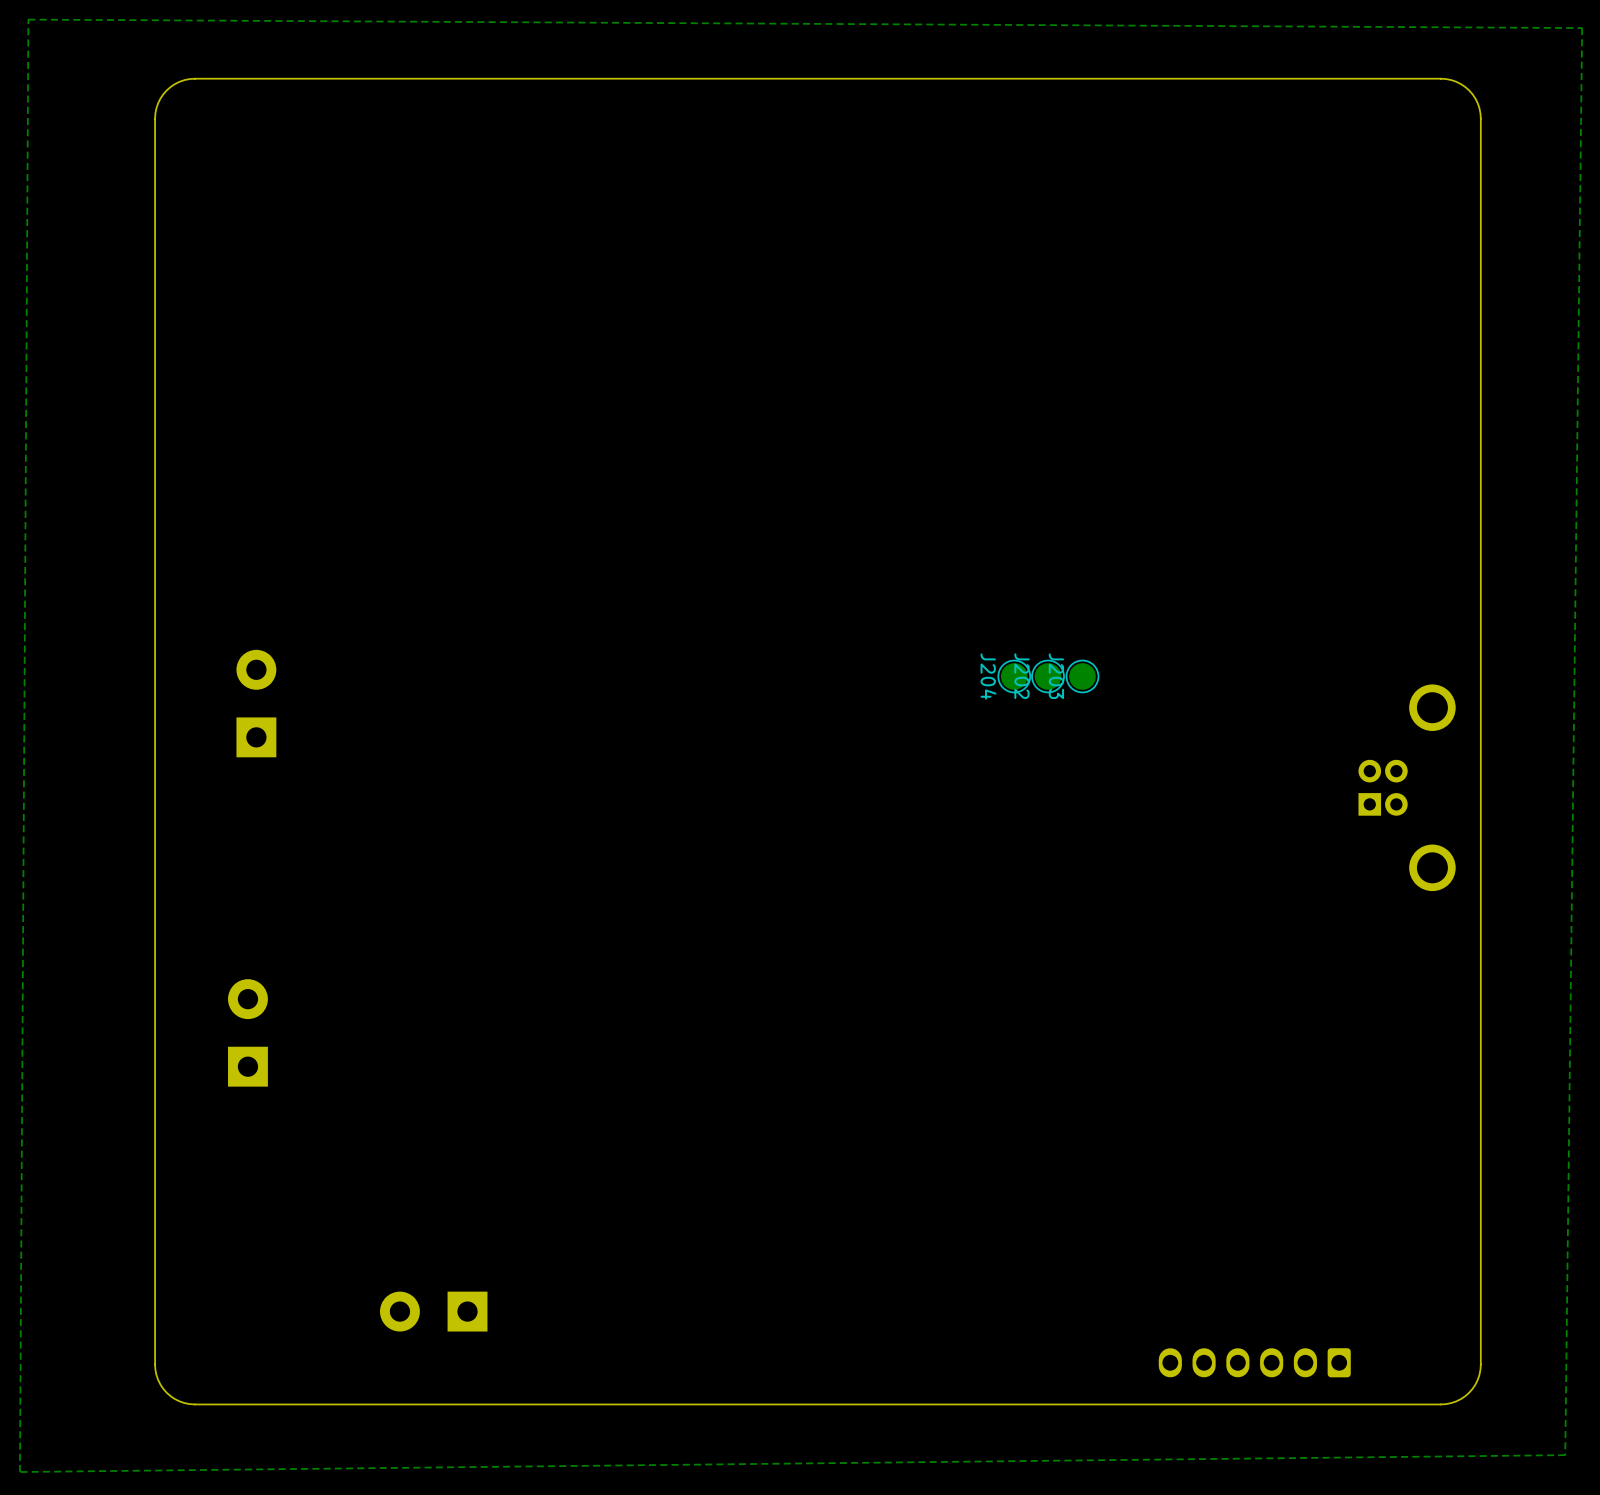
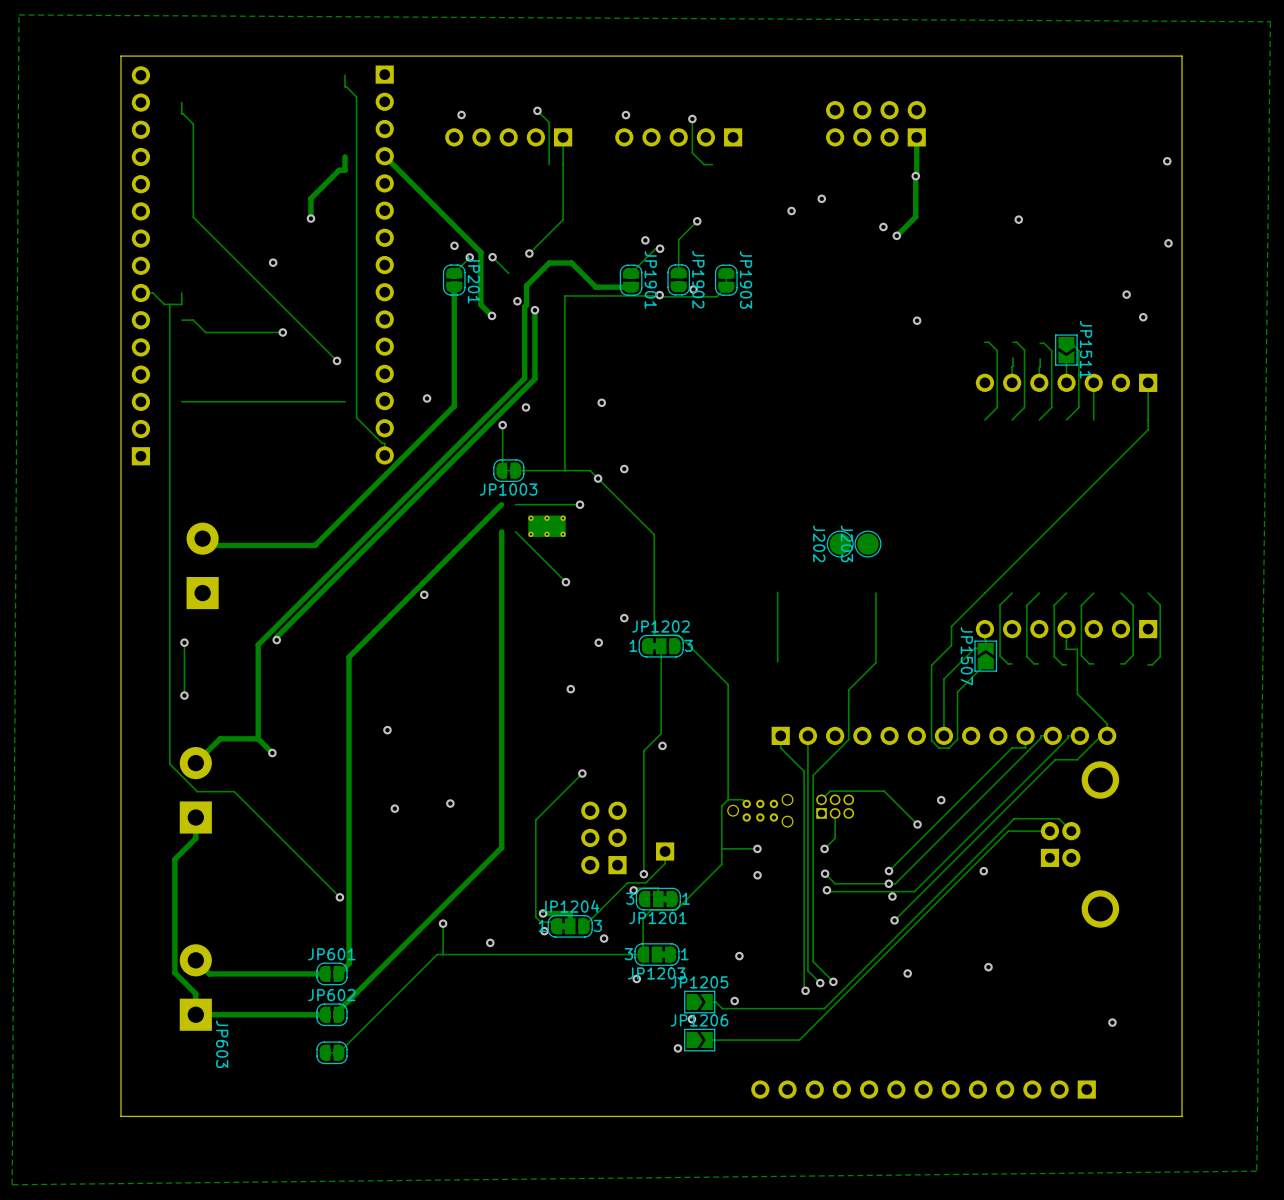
track: none -> (345, 75) (345, 86) (356, 96) (356, 417) (382, 443) (384, 443) (384, 455)
board edge: (155, 118) (158, 103) (166, 90) (179, 81) (194, 78) (1440, 78) (1456, 81) (1469, 90) (1477, 103) (1480, 118) (1480, 1364) (1477, 1379) (1469, 1392) (1456, 1401) (1440, 1404) (194, 1404) (179, 1401) (166, 1392) (158, 1379) (155, 1364) -> (121, 94) (121, 56) (1182, 56) (1182, 1116) (121, 1116) (121, 1098)
track: none -> (181, 102) (181, 114) (193, 124) (193, 217) (337, 360)
track: none -> (537, 110) (549, 122) (549, 164)
via: none -> (537, 110)
via: none -> (461, 114)
via: none -> (625, 115)
track: none -> (692, 118) (692, 152) (704, 164) (712, 164)
via: none -> (692, 118)
part: none -> (875, 123)
part: none -> (508, 137)
track: none -> (563, 137) (563, 219) (529, 253)
part: none -> (678, 137)
track: none -> (916, 137) (915, 216) (896, 235)
track: none -> (384, 156) (480, 252) (480, 304) (491, 315)
track: none -> (345, 156) (345, 170) (339, 170) (310, 198) (310, 218)
via: none -> (1167, 161)
via: none -> (915, 176)
via: none -> (821, 198)
via: none -> (791, 210)
via: none -> (310, 218)
via: none -> (1018, 219)
track: none -> (697, 221) (678, 239) (678, 272)
via: none -> (697, 221)
via: none -> (883, 227)
via: none -> (896, 235)
via: none -> (645, 240)
via: none -> (1168, 243)
via: none -> (454, 245)
track: none -> (660, 248) (655, 248) (631, 273)
via: none -> (660, 248)
via: none -> (529, 253)
track: none -> (469, 257) (454, 273)
via: none -> (469, 257)
track: none -> (492, 257) (508, 273)
via: none -> (492, 257)
via: none -> (273, 262)
part: none -> (384, 265)
part: none -> (140, 265)
track: none -> (726, 273) (726, 287) (716, 296) (659, 295)
JP201: none -> (454, 280)
JP1901: none -> (631, 280)
JP1902: none -> (678, 279)
JP1903: none -> (726, 280)
track: none -> (454, 287) (454, 406) (315, 545) (195, 545)
track: none -> (631, 287) (595, 287) (571, 262) (549, 262) (526, 285) (524, 378) (258, 644) (258, 738)
via: none -> (693, 289)
track: none -> (181, 292) (181, 304) (164, 304) (152, 293) (140, 293)
via: none -> (1126, 294)
via: none -> (659, 295)
track: none -> (659, 295) (564, 295) (564, 470)
via: none -> (517, 301)
track: none -> (169, 304) (169, 764) (197, 791) (234, 791) (339, 897)
track: none -> (534, 310) (534, 378) (276, 637) (276, 640)
via: none -> (534, 310)
via: none -> (491, 315)
via: none -> (1143, 317)
track: none -> (181, 320) (193, 320) (205, 332) (282, 332)
via: none -> (917, 320)
via: none -> (282, 332)
track: none -> (984, 342) (988, 342) (997, 350) (997, 407) (984, 419)
track: none -> (1012, 342) (1016, 342) (1024, 350) (1024, 407) (1012, 419)
track: none -> (1066, 342) (1070, 342) (1078, 350) (1078, 407) (1066, 419)
track: none -> (1040, 343) (1044, 343) (1051, 350) (1051, 407) (1039, 419)
JP1511: none -> (1066, 350)
track: none -> (1012, 357) (1012, 382)
track: none -> (1066, 357) (1066, 382)
track: none -> (1040, 358) (1039, 382)
via: none -> (337, 360)
part: none -> (1066, 382)
track: none -> (1093, 382) (1093, 419)
track: none -> (1148, 382) (1148, 429) (951, 626) (951, 645) (931, 665) (931, 740) (939, 748) (948, 748) (957, 739) (957, 692) (985, 663)
via: none -> (427, 398)
track: none -> (345, 401) (181, 401)
via: none -> (601, 402)
via: none -> (525, 407)
track: none -> (502, 425) (502, 470)
via: none -> (502, 425)
via: none -> (624, 469)
track: none -> (501, 470) (590, 470) (654, 534) (654, 635) (678, 635) (728, 684) (728, 799)
JP1003: none -> (508, 470)
via: none -> (598, 478)
track: none -> (501, 504) (349, 657) (349, 963) (338, 973)
track: none -> (579, 504) (515, 504)
via: none -> (580, 504)
part: none -> (547, 526)
track: none -> (501, 531) (501, 847) (338, 1010) (338, 1014)
track: none -> (515, 531) (565, 582)
J204: (1014, 676) -> none
via: none -> (565, 582)
track: none -> (777, 592) (777, 661)
track: none -> (875, 593) (875, 662) (848, 689) (848, 739) (813, 775) (813, 961) (833, 981)
track: none -> (1012, 593) (1000, 605) (1000, 655) (1008, 663) (1011, 663)
track: none -> (1039, 593) (1026, 605) (1026, 656) (1034, 663) (1038, 663)
track: none -> (1066, 593) (1054, 605) (1054, 656) (1062, 664) (1066, 664)
track: none -> (1093, 593) (1081, 605) (1081, 655) (1089, 663) (1093, 663)
track: none -> (1120, 593) (1133, 605) (1133, 655) (1124, 663) (1120, 663)
track: none -> (1148, 593) (1160, 605) (1160, 656) (1152, 664) (1147, 664)
via: none -> (424, 594)
via: none -> (624, 618)
track: none -> (984, 629) (985, 648) (974, 648) (943, 679) (943, 735)
track: none -> (1066, 629) (1066, 649) (1077, 649) (1077, 694) (1107, 723) (1107, 735)
part: none -> (1066, 629)
part position: (1407, 787) -> (1079, 844)
via: none -> (276, 640)
track: none -> (184, 642) (184, 695)
via: none -> (184, 642)
via: none -> (598, 642)
track: none -> (661, 646) (661, 733) (643, 750) (643, 874)
JP1202: none -> (661, 646)
JP1507: none -> (985, 656)
via: none -> (570, 689)
via: none -> (184, 695)
via: none -> (387, 730)
track: none -> (1107, 729) (1077, 759) (1055, 759) (894, 920)
track: none -> (780, 735) (780, 747) (804, 771) (805, 990)
track: none -> (807, 735) (807, 970) (820, 983)
part: none -> (943, 735)
track: none -> (1025, 735) (1025, 747) (1012, 747) (889, 871)
track: none -> (1052, 735) (1040, 735) (1040, 738) (895, 883) (835, 883) (825, 873)
track: none -> (1079, 735) (1067, 735) (1067, 738) (914, 891) (826, 890)
track: none -> (258, 738) (272, 753)
track: none -> (258, 738) (220, 738) (195, 763)
via: none -> (662, 745)
via: none -> (272, 753)
track: none -> (582, 773) (535, 820) (535, 917) (540, 922) (551, 922) (556, 926)
via: none -> (582, 773)
track: none -> (728, 799) (721, 806) (721, 864) (676, 910) (651, 910) (643, 918) (643, 954) (437, 954) (338, 1052) (325, 1052)
track: none -> (728, 799) (742, 799) (746, 803)
track: none -> (821, 799) (830, 791) (884, 791) (917, 824)
via: none -> (941, 800)
via: none -> (450, 803)
part: none -> (835, 806)
via: none -> (394, 808)
part: none -> (760, 810)
track: none -> (835, 813) (835, 838) (824, 848)
track: none -> (195, 817) (195, 838) (174, 859) (174, 972) (195, 993) (195, 1014) (325, 1014)
via: none -> (917, 824)
part position: (247, 1032) -> (195, 790)
track: none -> (1049, 831) (1008, 831) (799, 1040) (707, 1040)
track: none -> (1071, 831) (1058, 818) (1014, 818) (824, 1008) (722, 1008) (715, 1002) (707, 1002)
part: none -> (603, 837)
track: none -> (757, 848) (721, 848)
via: none -> (757, 848)
via: none -> (824, 848)
track: none -> (665, 851) (665, 863) (645, 882) (627, 882) (584, 926)
part: none -> (665, 851)
via: none -> (889, 871)
via: none -> (983, 871)
via: none -> (825, 873)
via: none -> (643, 874)
via: none -> (757, 875)
via: none -> (888, 883)
track: none -> (633, 890) (635, 888) (658, 888) (658, 899)
via: none -> (633, 890)
via: none -> (826, 890)
via: none -> (892, 896)
via: none -> (339, 897)
JP1201: none -> (658, 899)
track: none -> (543, 913) (570, 913) (570, 926)
via: none -> (543, 913)
via: none -> (894, 920)
track: none -> (443, 923) (443, 954)
via: none -> (443, 923)
JP1204: none -> (570, 926)
via: none -> (544, 931)
via: none -> (604, 938)
via: none -> (490, 942)
JP1203: none -> (656, 954)
via: none -> (739, 956)
track: none -> (195, 960) (209, 973) (325, 973)
via: none -> (988, 967)
via: none -> (907, 973)
JP601: none -> (332, 973)
via: none -> (636, 978)
via: none -> (833, 981)
via: none -> (820, 983)
part: none -> (195, 987)
via: none -> (805, 990)
via: none -> (734, 1001)
JP1205: none -> (699, 1002)
JP602: none -> (332, 1014)
via: none -> (691, 1019)
via: none -> (1112, 1022)
JP1206: none -> (699, 1040)
via: none -> (677, 1048)
JP603: none -> (332, 1052)
part: (433, 1311) -> none
part: none -> (923, 1089)
part: (1254, 1362) -> none

